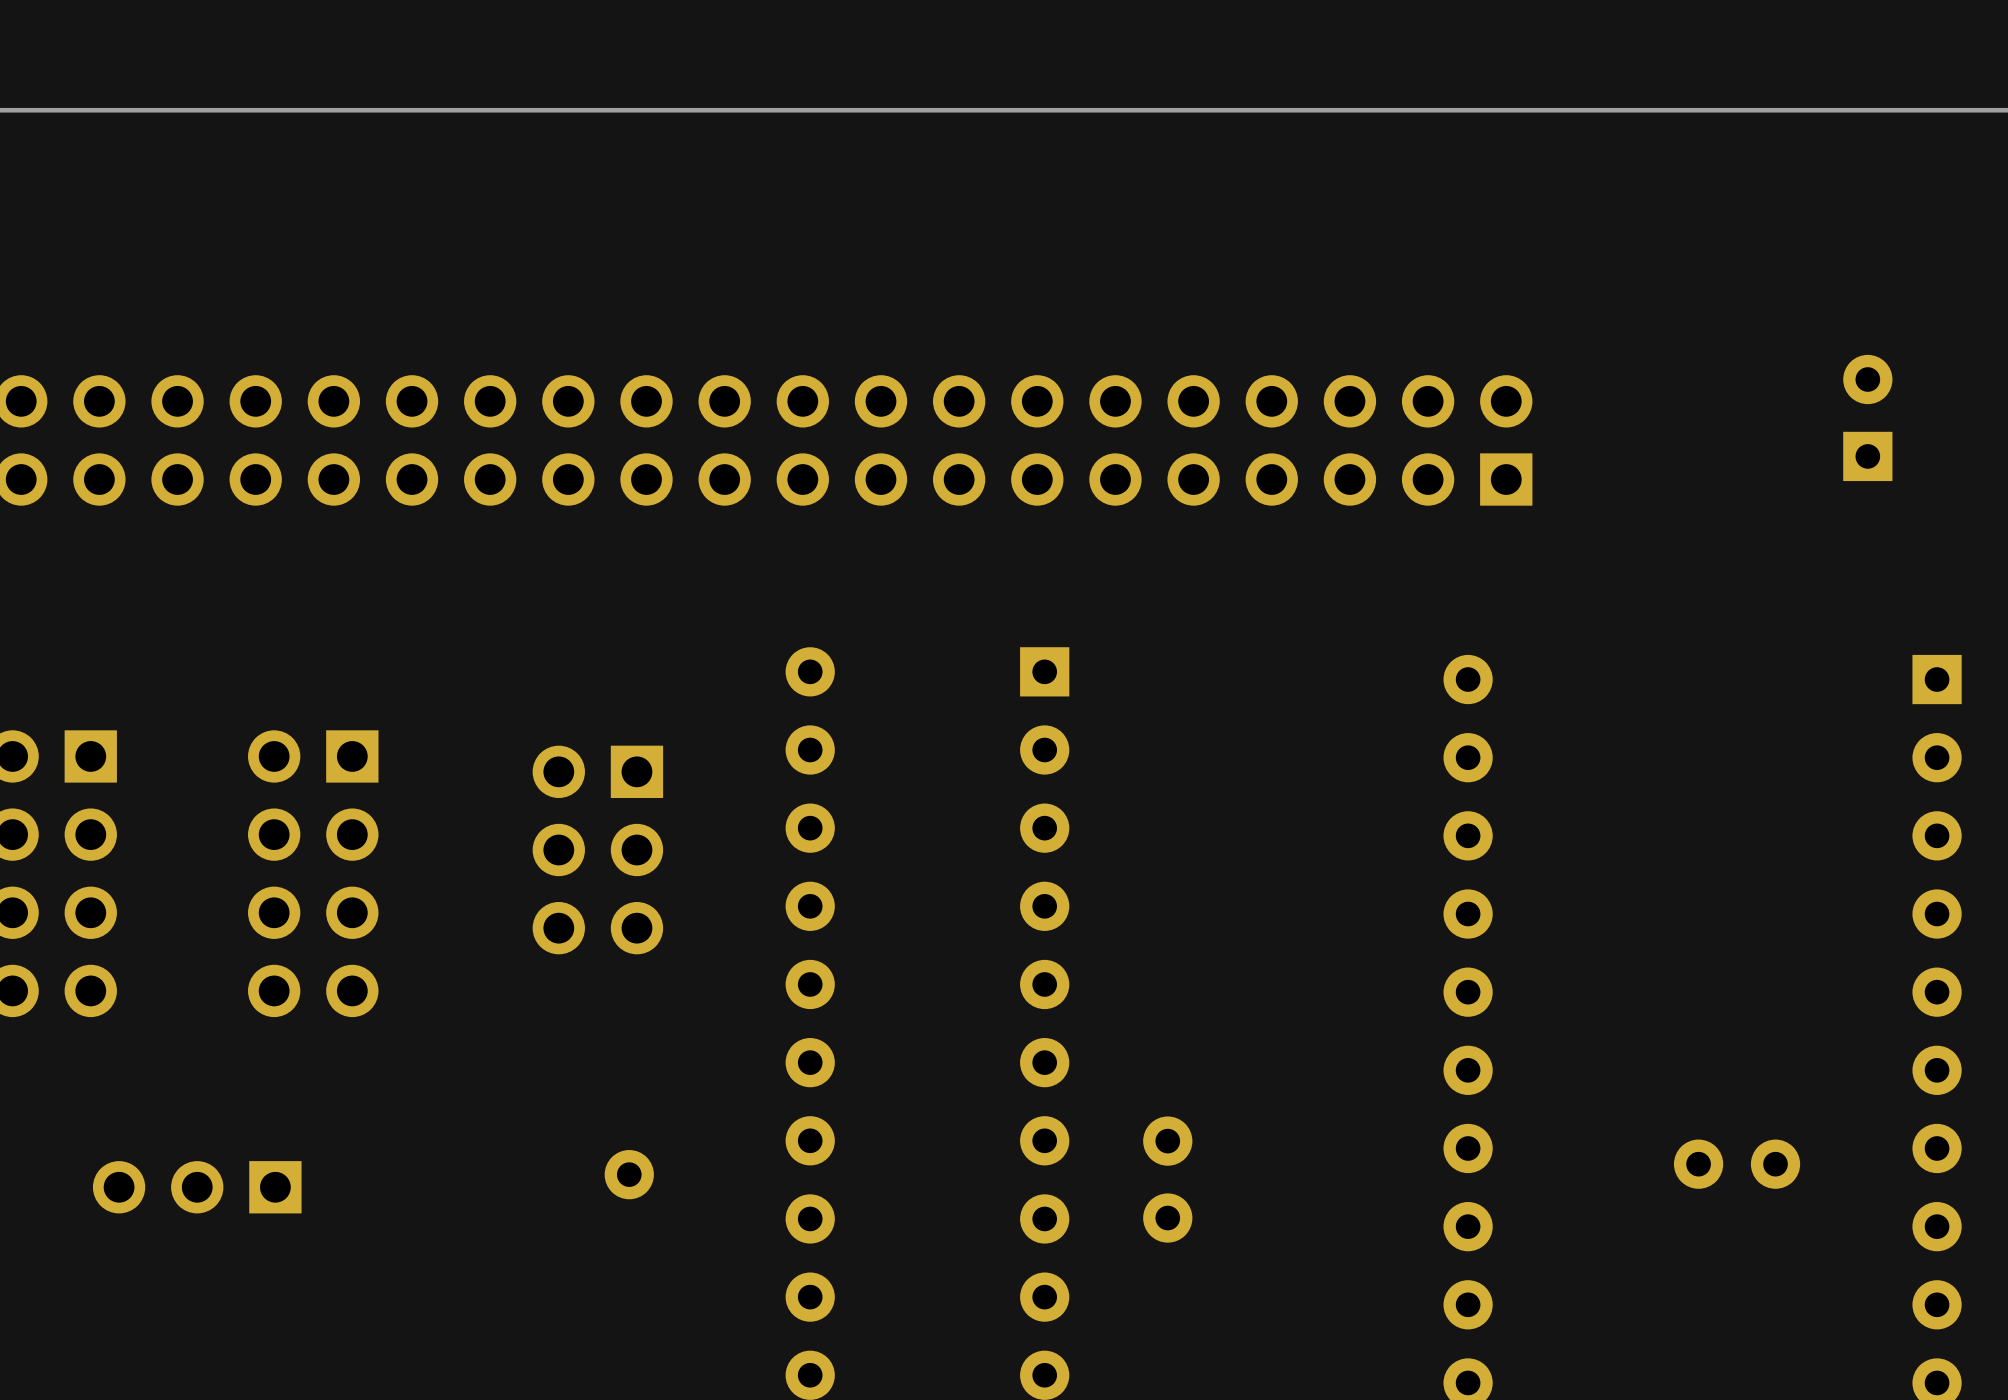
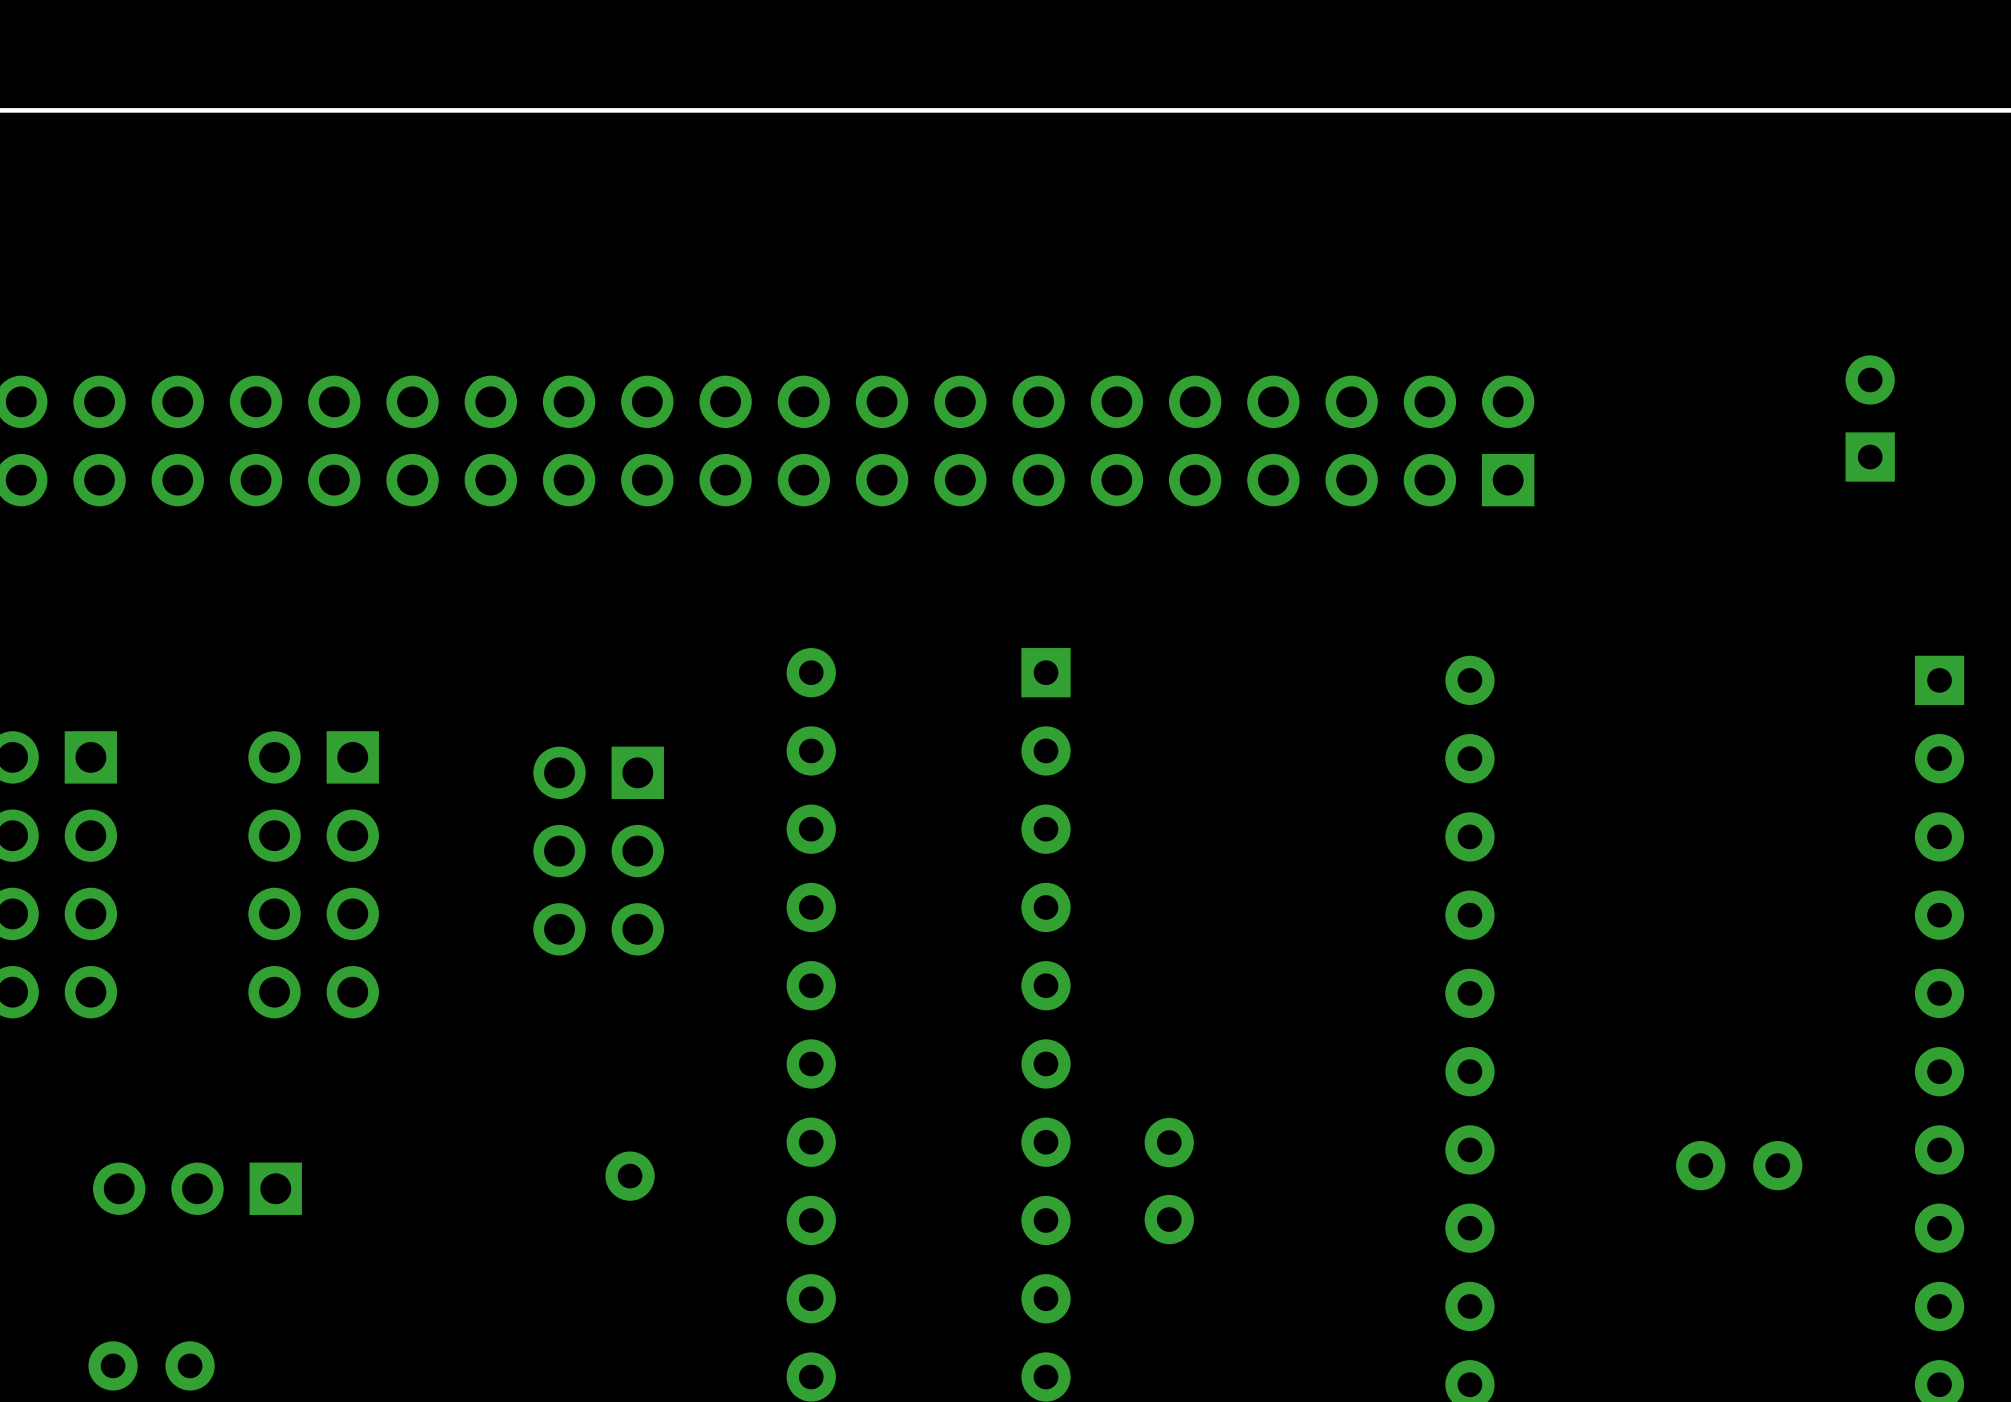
part: none -> (151, 1365)

